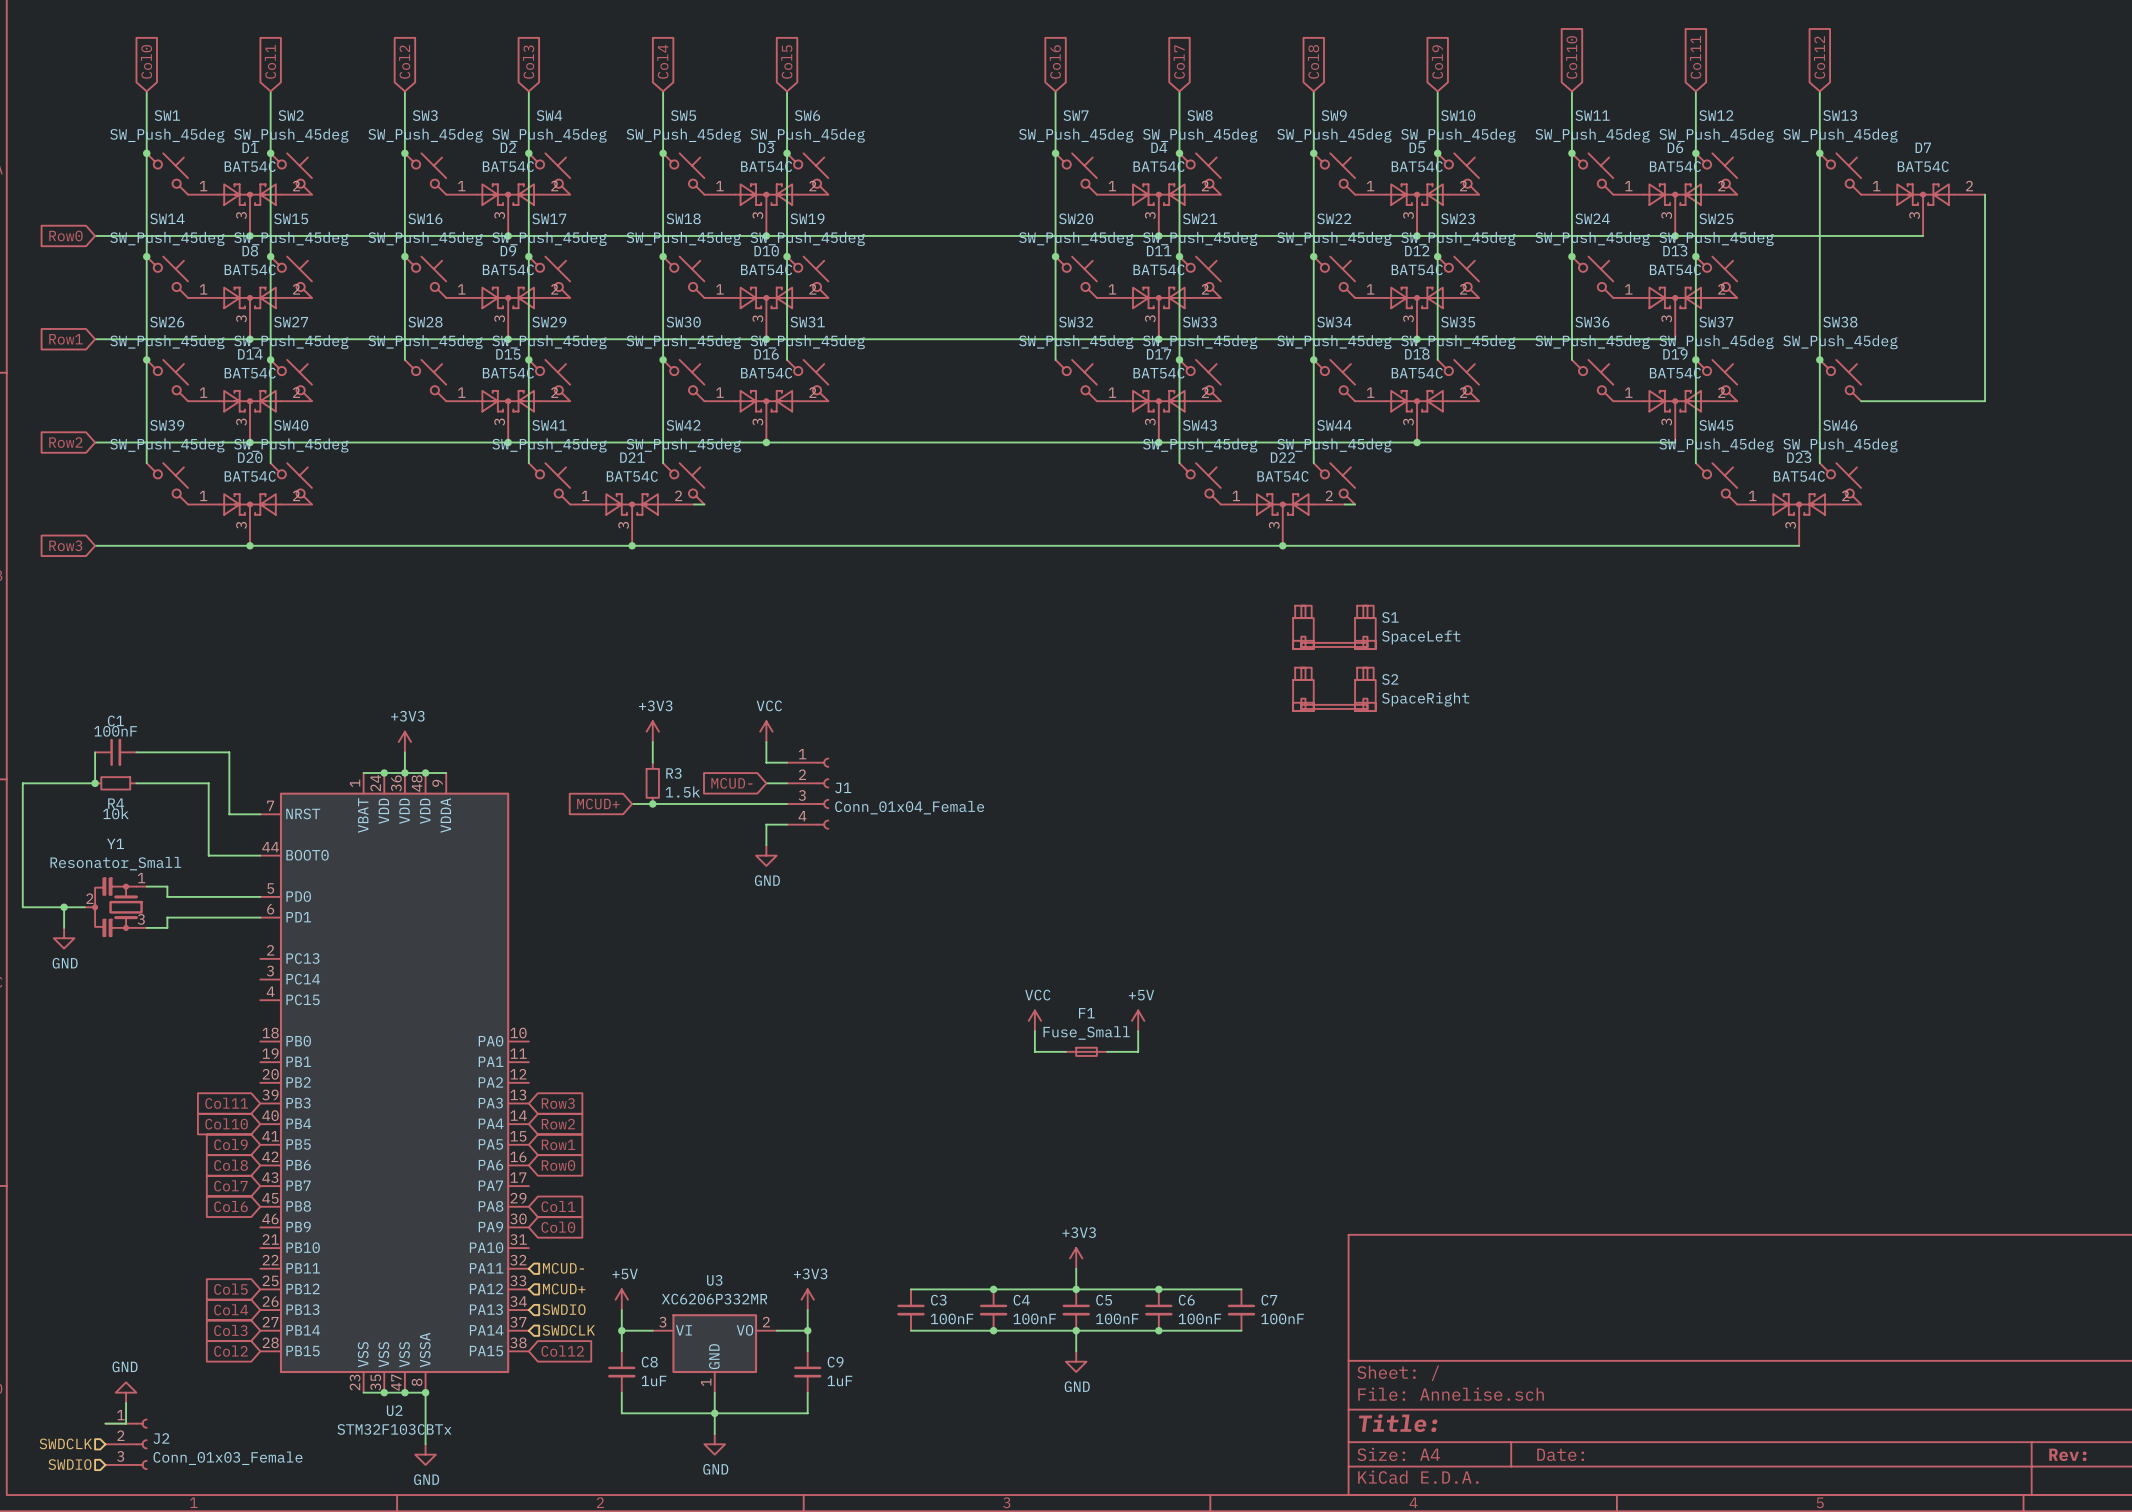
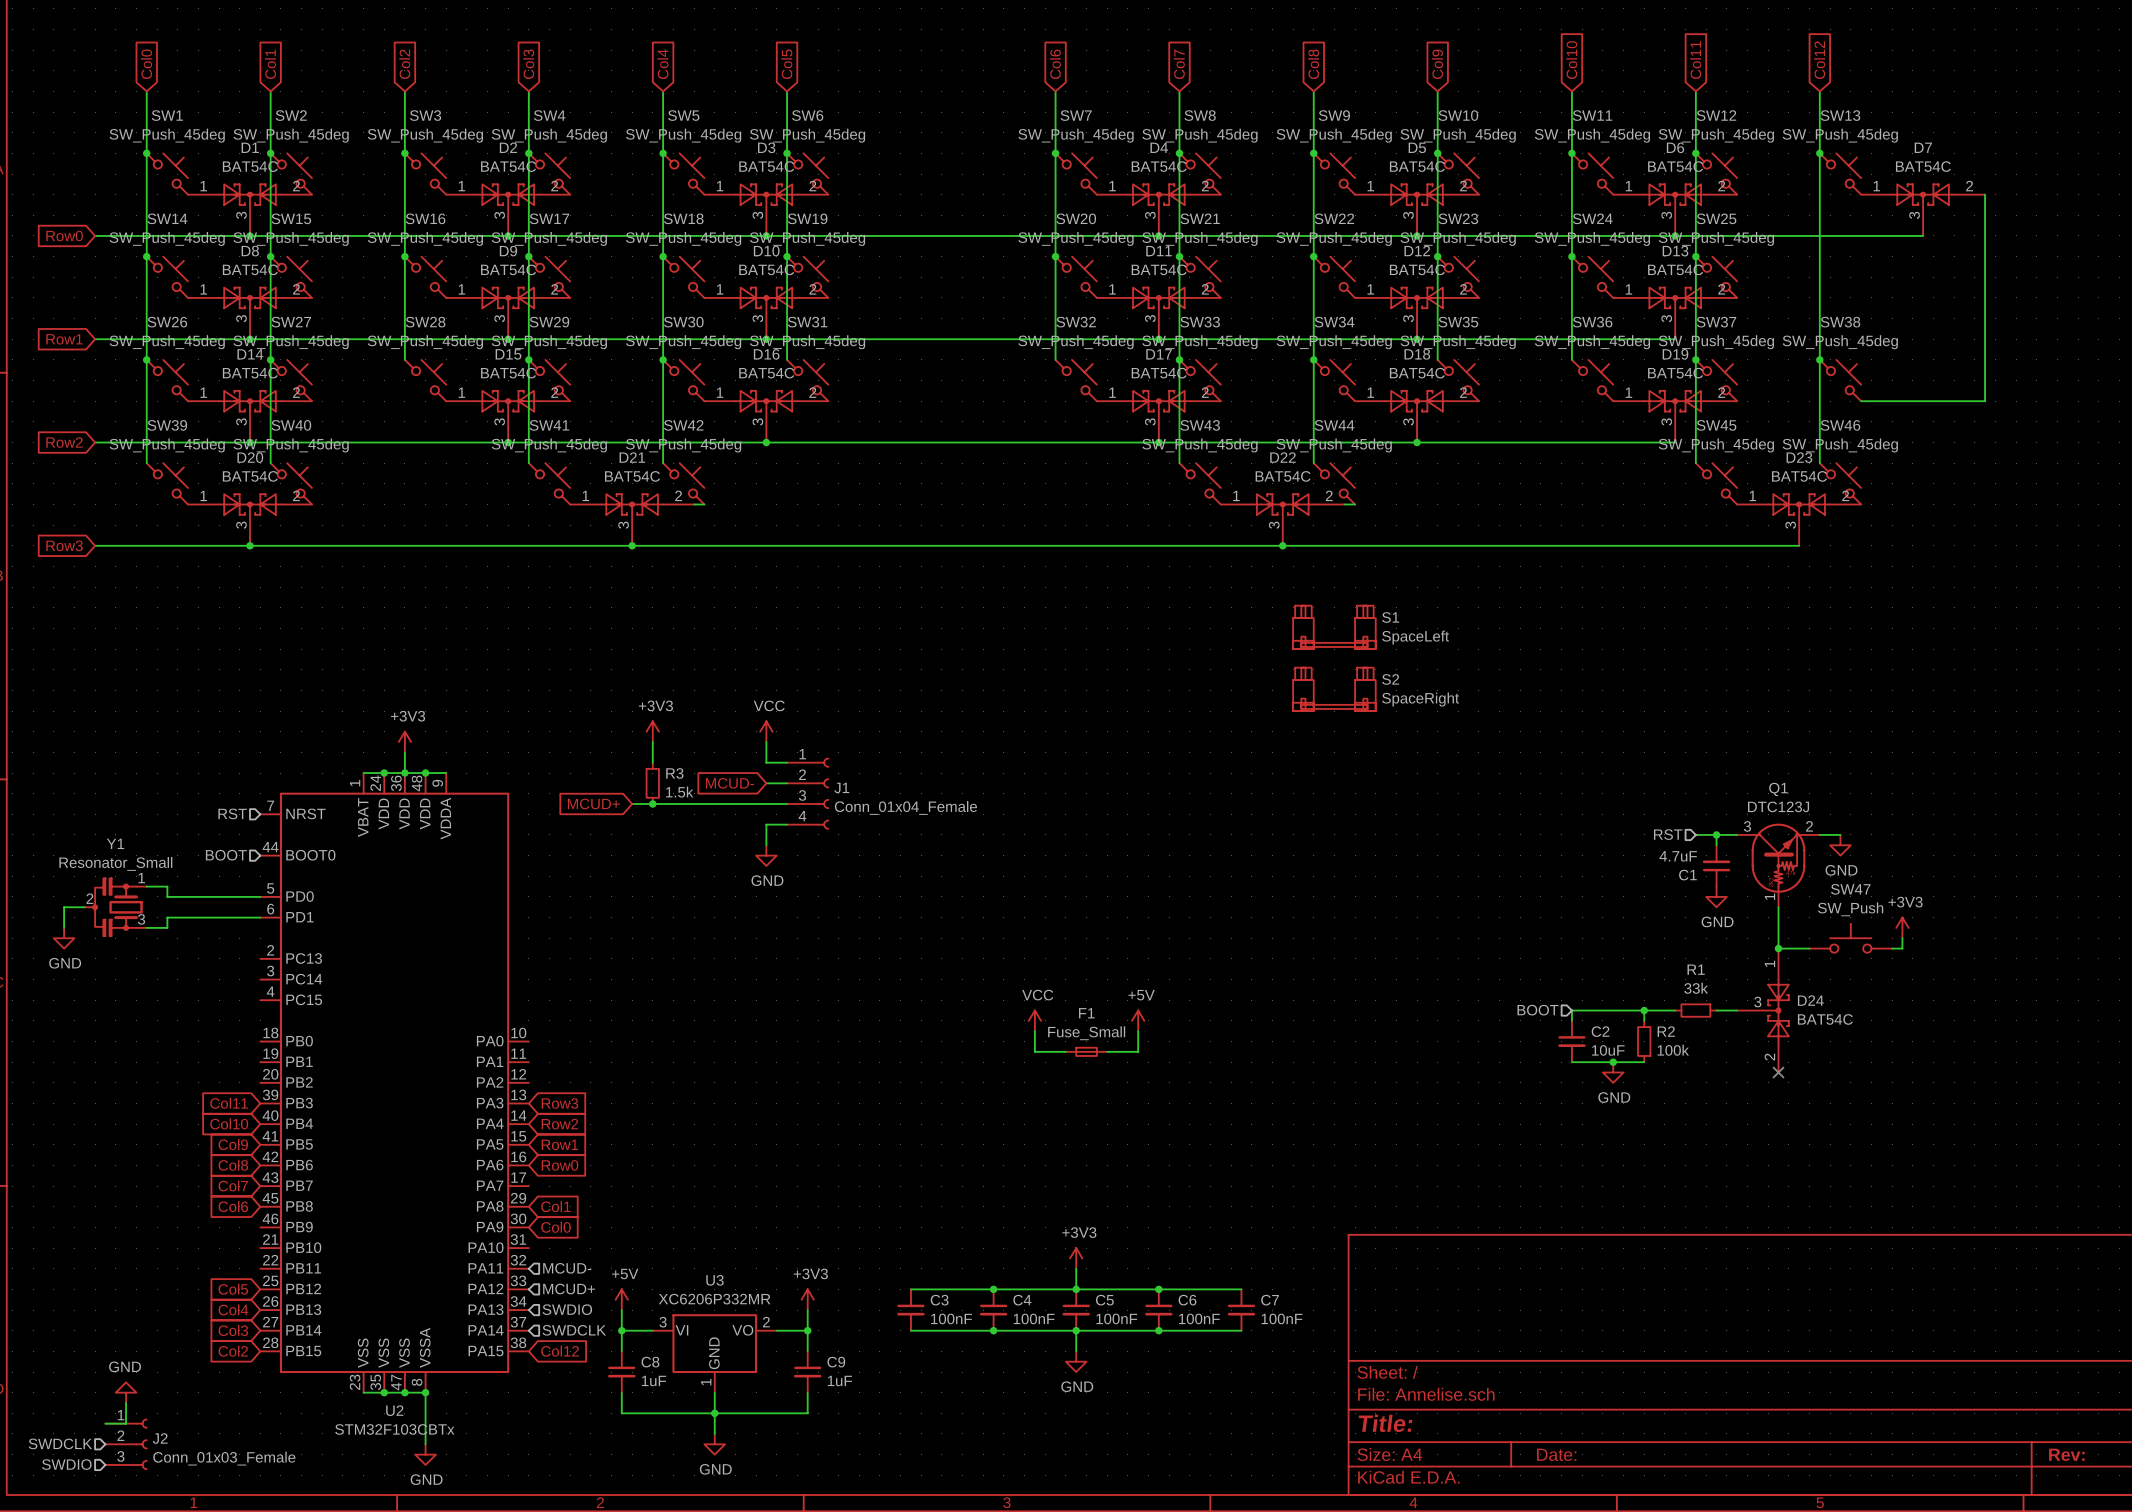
C1 value: 100nF (115, 731) -> 4.7uF (1678, 856)
wire: (95, 752) (95, 783) (22, 783) (22, 907) (64, 907) -> none
C1 rotation: 0° (115, 752) -> 90° counterclockwise (1716, 865)
C1 position: (115, 752) -> (1716, 865)
wire: (136, 752) (229, 752) (229, 814) (260, 814) -> none
junction: (95, 783) -> none
R4: 10k (115, 783) -> none
wire: (136, 783) (208, 783) (208, 855) (260, 855) -> none
hierarchical label: none -> RST (232, 813)
hierarchical label: none -> RST (1668, 834)
wire: none -> (1695, 834) (1737, 834)
wire: none -> (1716, 834) (1716, 845)
junction: none -> (1716, 834)
wire: none -> (1819, 834) (1840, 834)
power symbol: none -> GND (1840, 845)
hierarchical label: none -> BOOT (226, 855)
Q1: none -> DTC123J (1778, 865)
power symbol: none -> GND (1716, 896)
junction: (64, 907) -> none
wire: none -> (1778, 907) (1778, 948) (1809, 948)
power symbol: none -> +3V3 (1902, 927)
SW47: none -> SW_Push (1850, 938)
wire: none -> (1902, 938) (1902, 948) (1892, 948)
junction: none -> (1778, 948)
hierarchical label: none -> BOOT (1538, 1010)
wire: none -> (1644, 1010) (1644, 1020)
junction: none -> (1644, 1010)
wire: none -> (1675, 1010) (1571, 1010) (1571, 1020)
R1: none -> 33k (1695, 1010)
wire: none -> (1716, 1010) (1737, 1010)
D24: none -> BAT54C (1763, 1010)
C2: none -> 10uF (1571, 1041)
R2: none -> 100k (1644, 1041)
wire: none -> (1571, 1062) (1644, 1062)
junction: none -> (1613, 1062)
power symbol: none -> GND (1613, 1072)
no-connect mark: none -> (1778, 1072)

